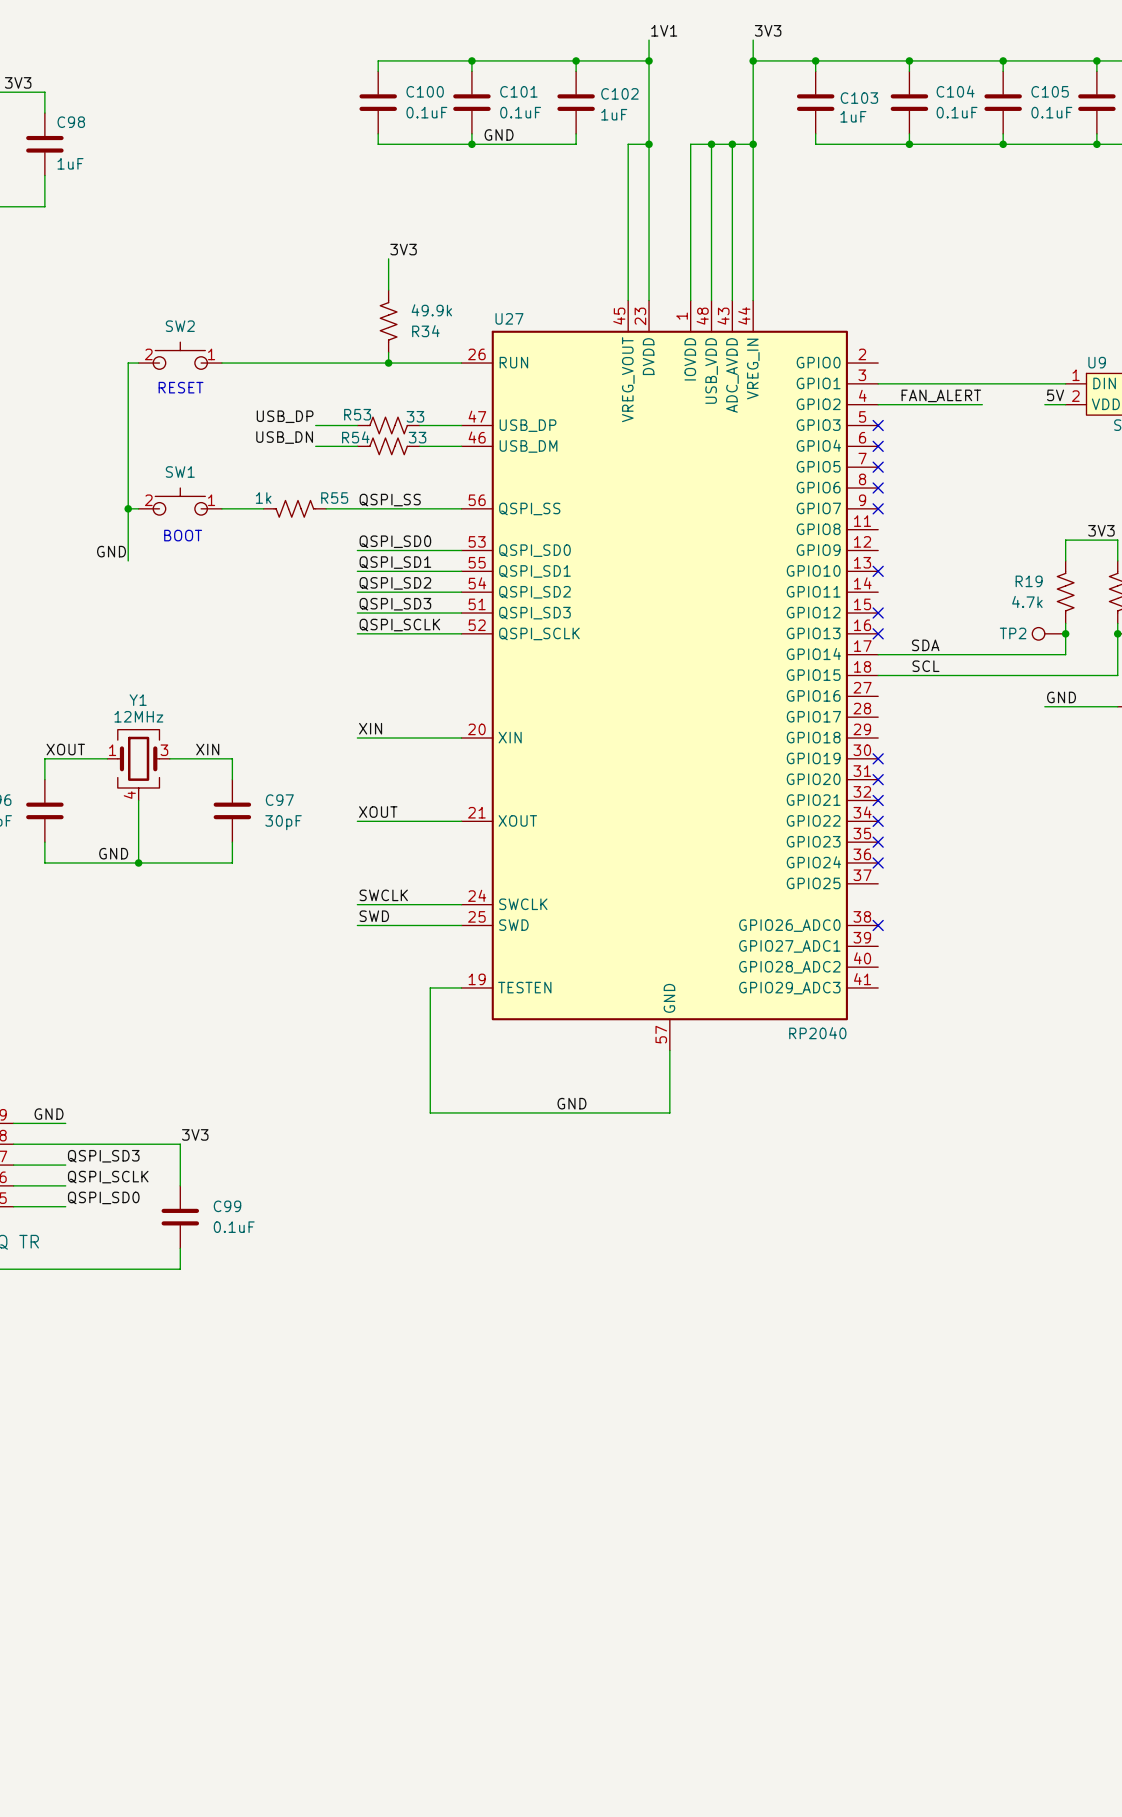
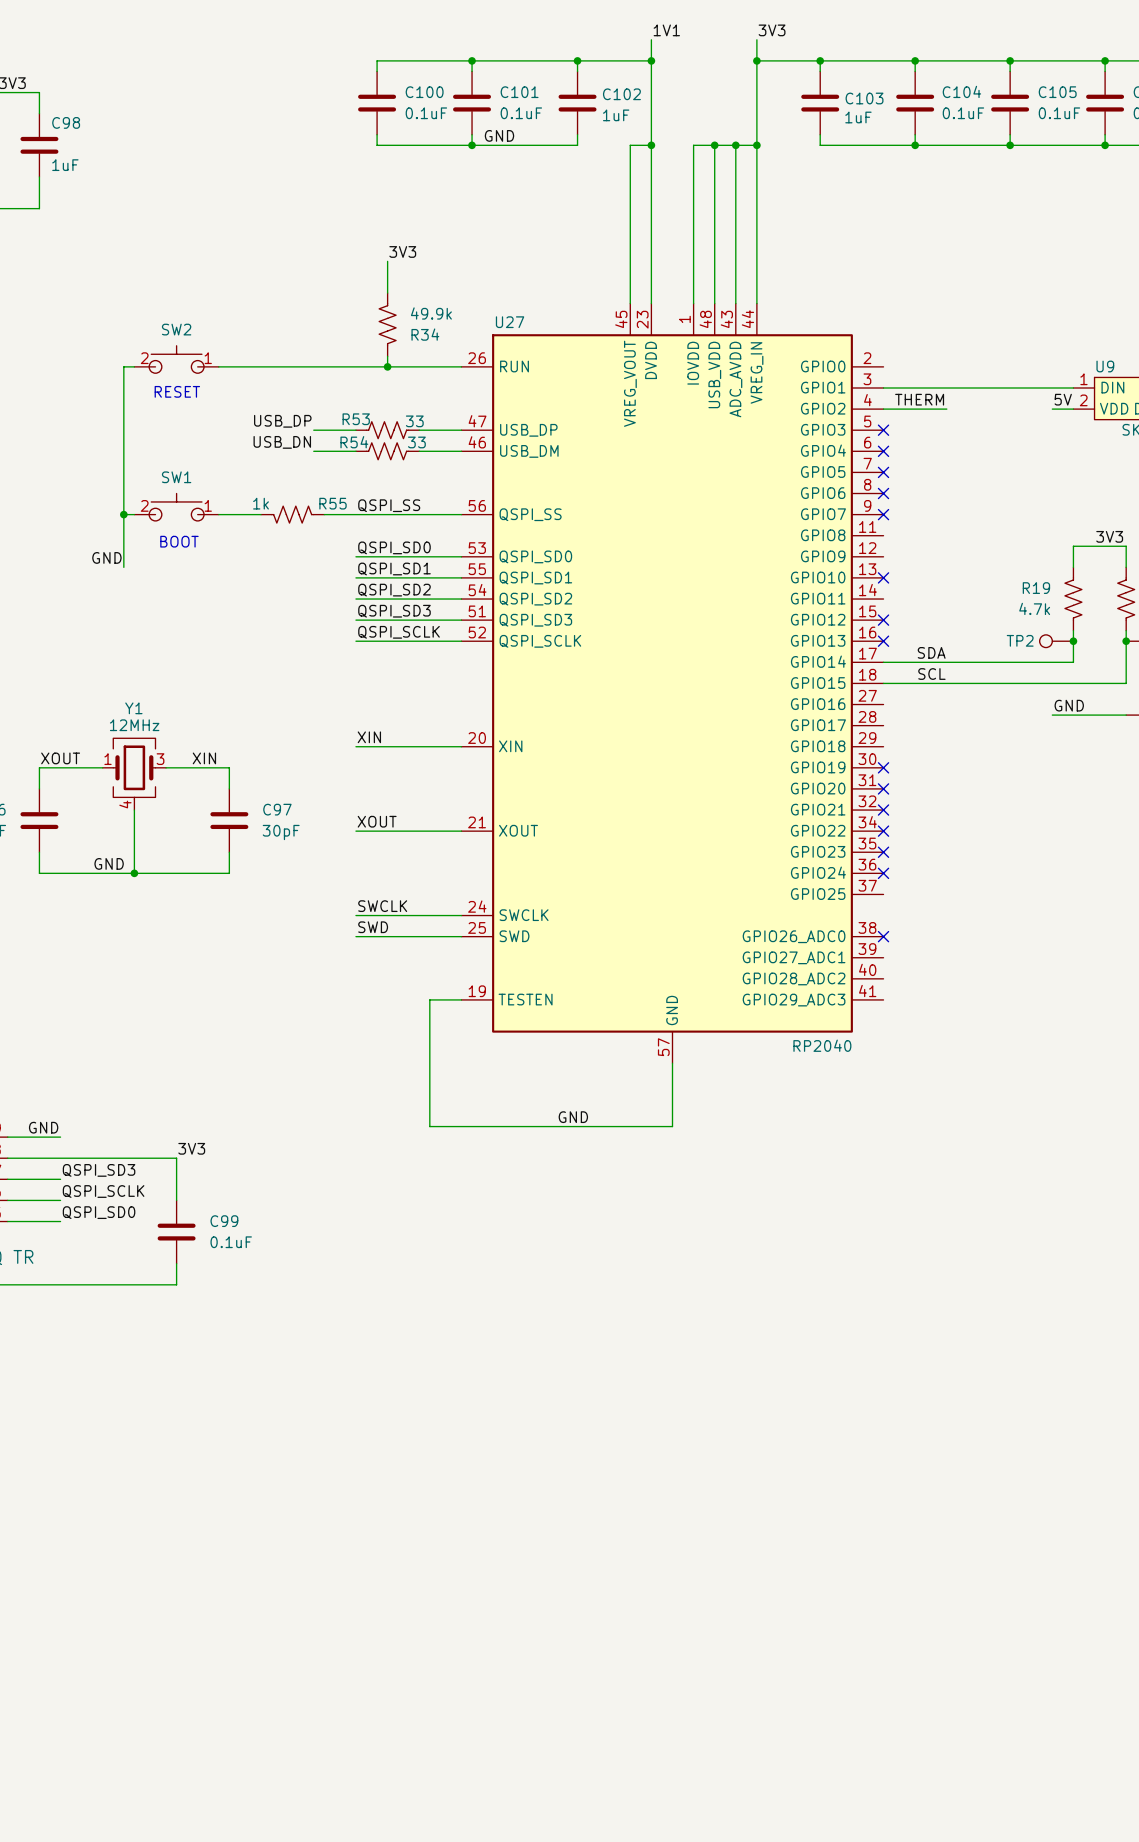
label: none -> THERM (919, 399)
label: FAN_ALERT (941, 395) -> none
wire: (940, 404) (982, 404) -> none

